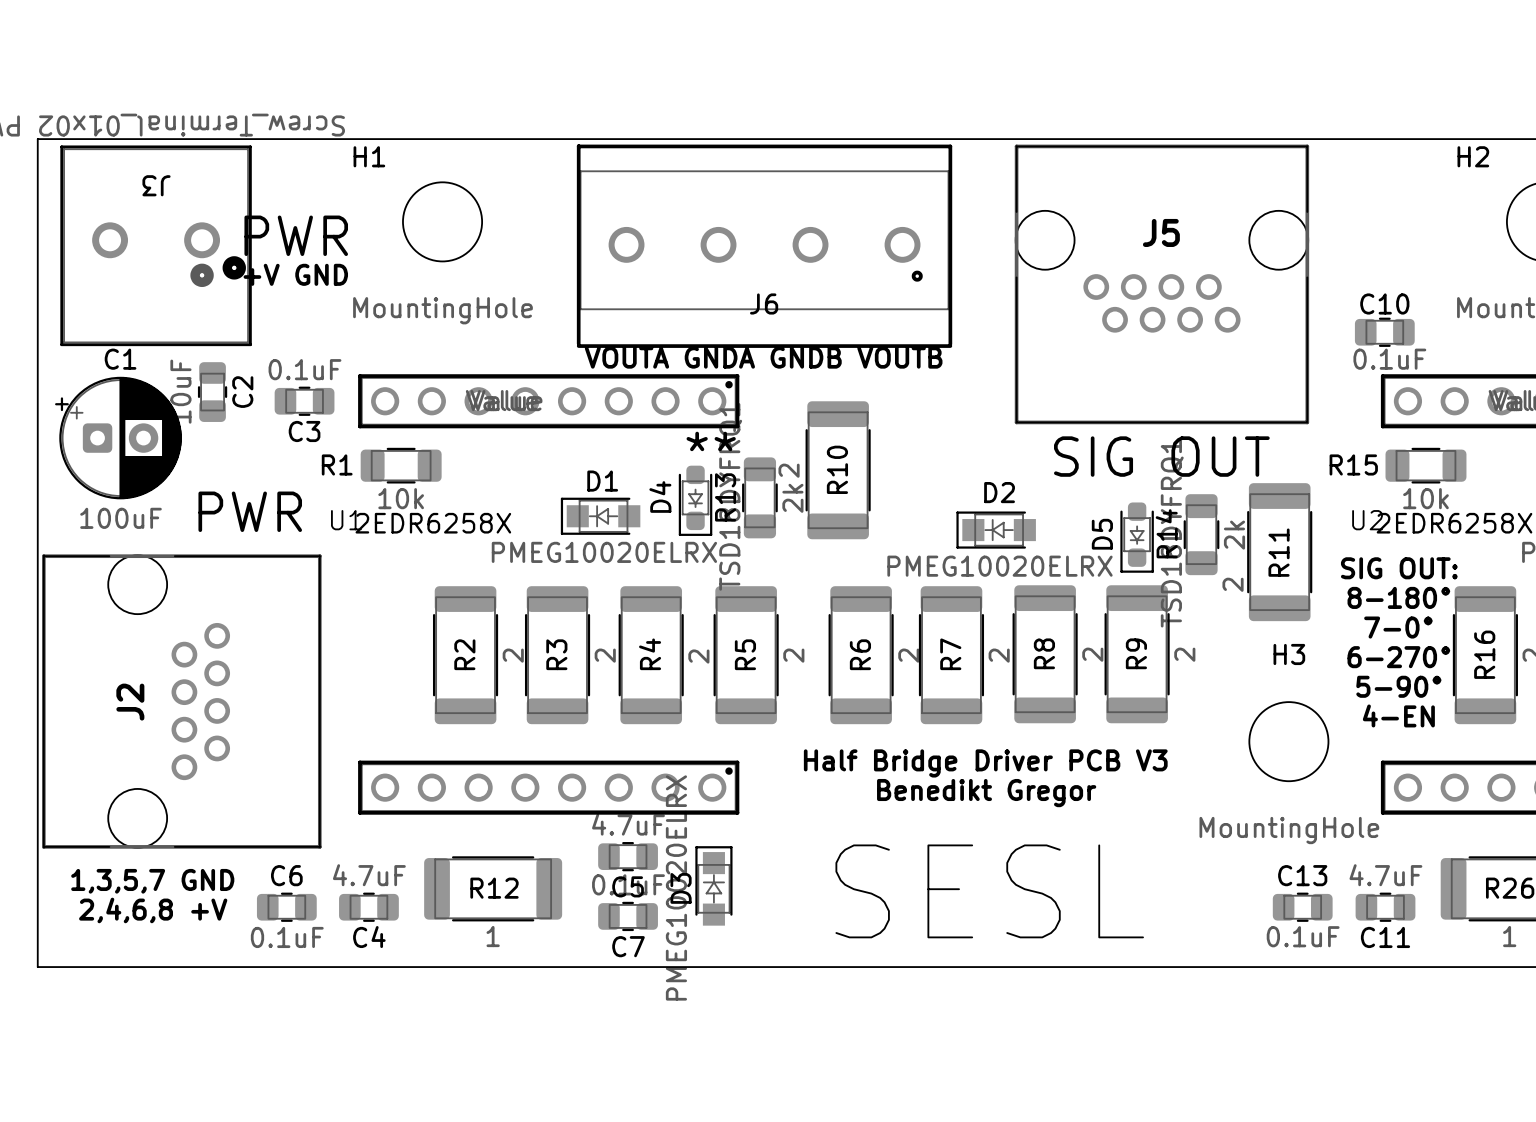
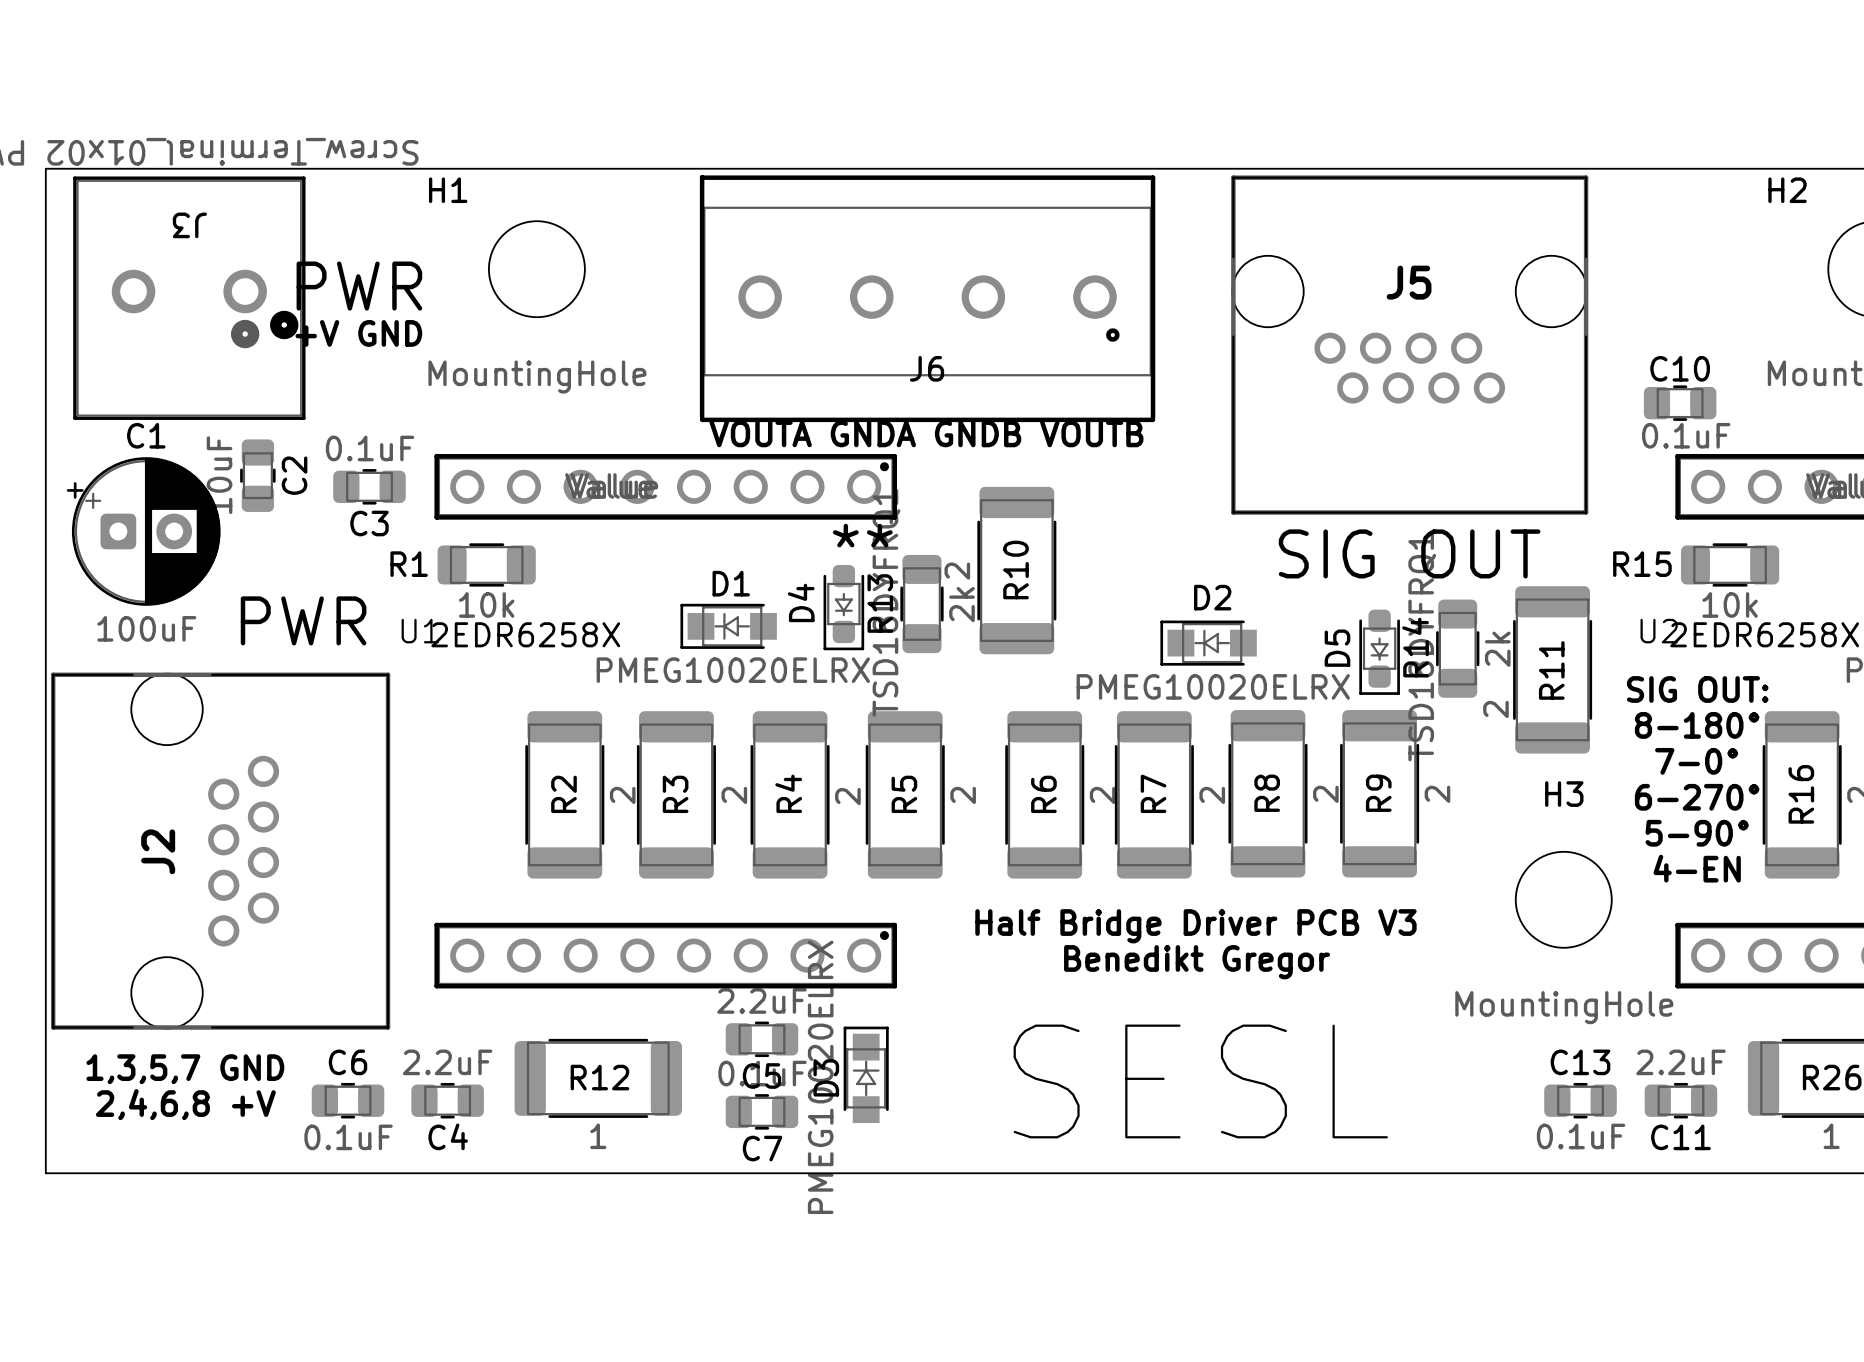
C5 value: 4.7uF (628, 824) -> 2.2uF (761, 1000)
C4 value: 4.7uF (369, 875) -> 2.2uF (447, 1062)
C11 value: 4.7uF (1385, 875) -> 2.2uF (1680, 1062)

